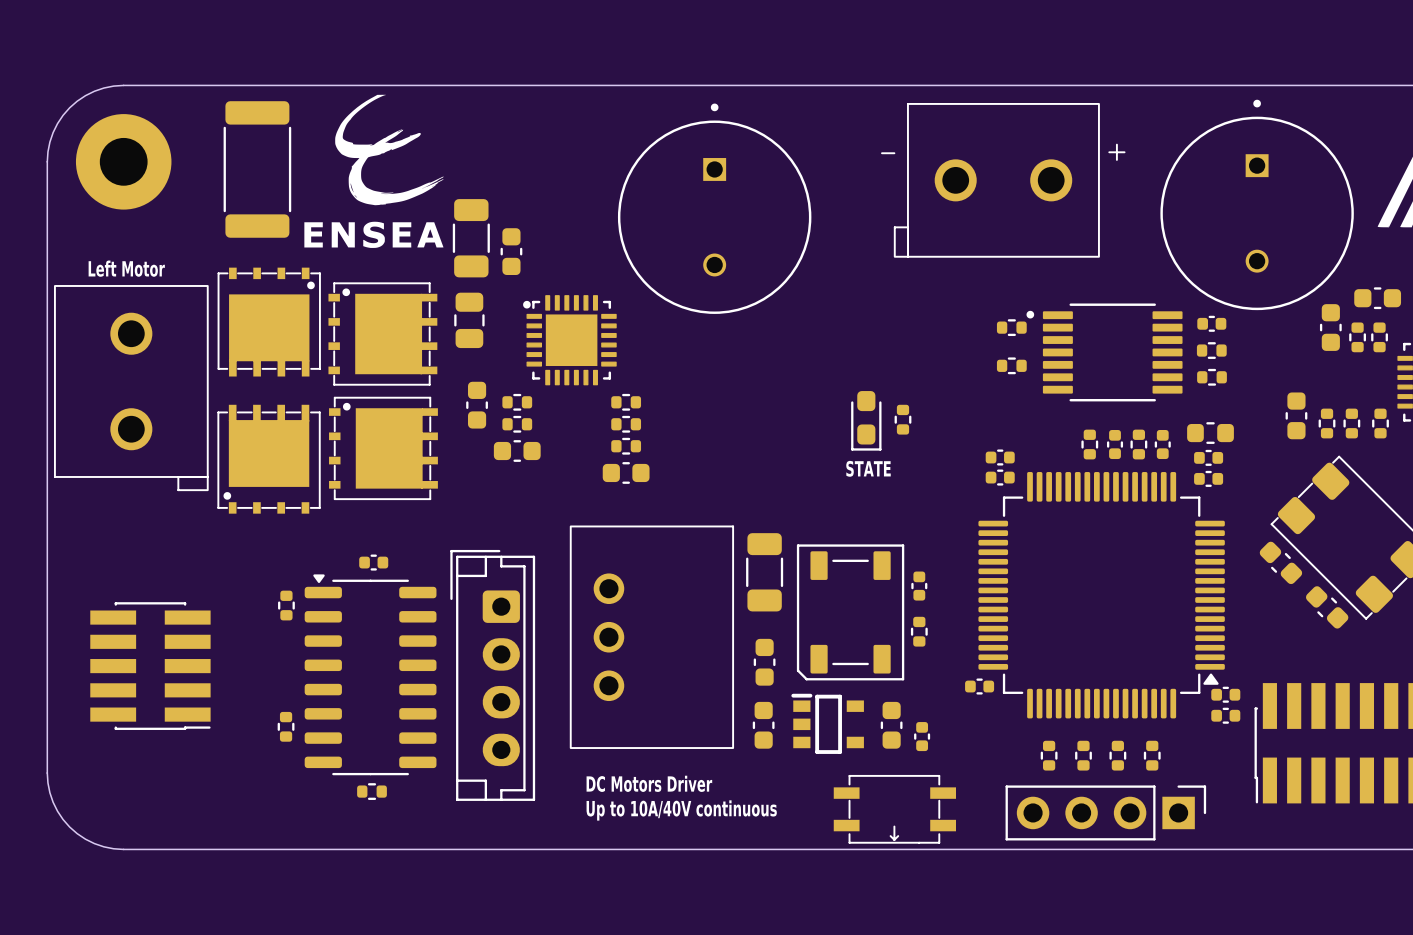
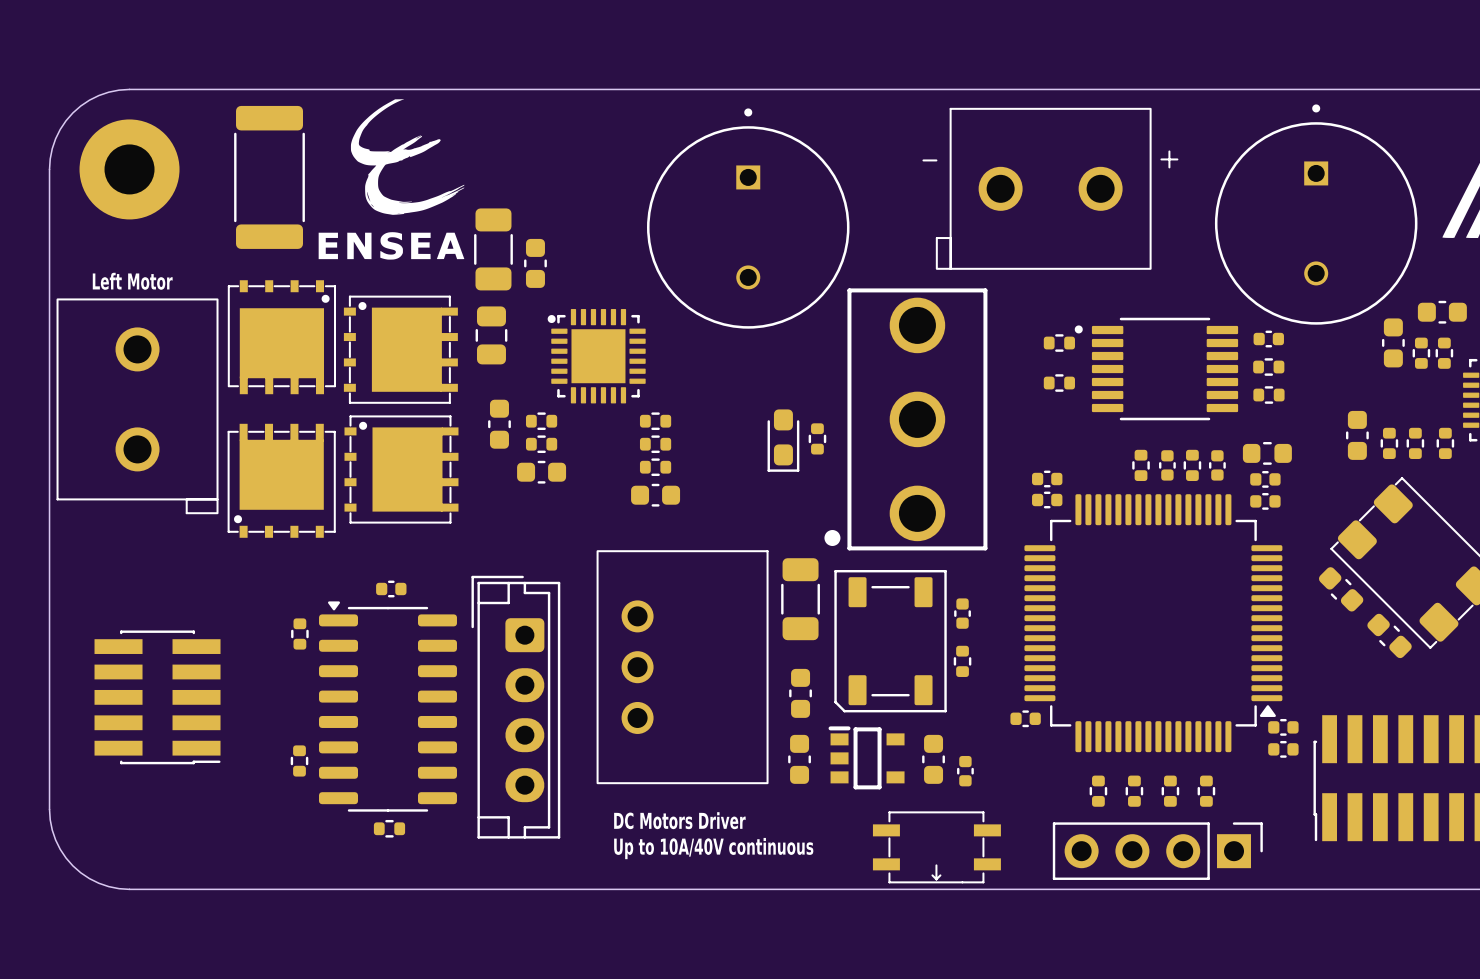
part: none -> (905, 419)
part position: (902, 419) -> (817, 438)
part position: (866, 420) -> (783, 440)
text: STATE (868, 468) -> none

